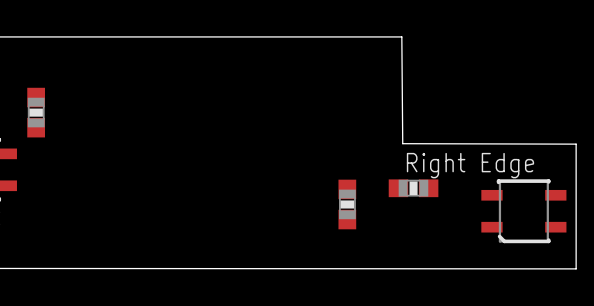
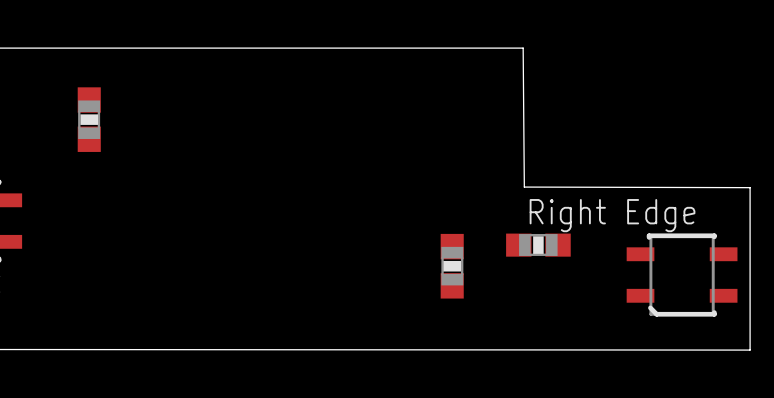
part position: (36, 112) -> (89, 119)

